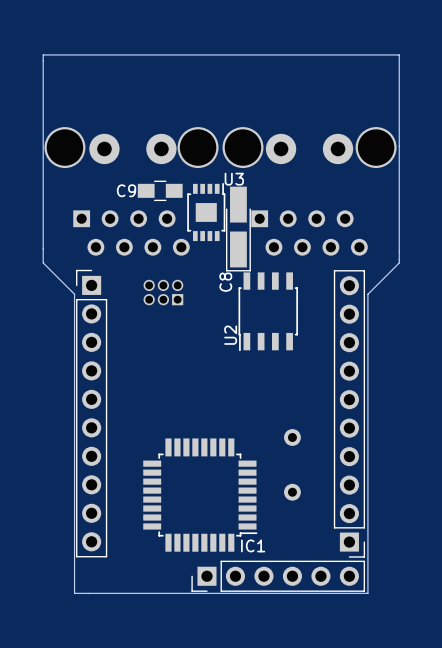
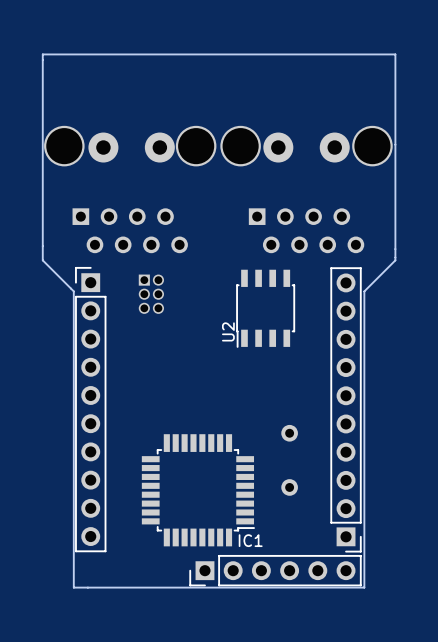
C9: (160, 190) -> none
U3: (206, 212) -> none
C8: (238, 229) -> none
part side: top (163, 292) -> bottom (151, 294)

